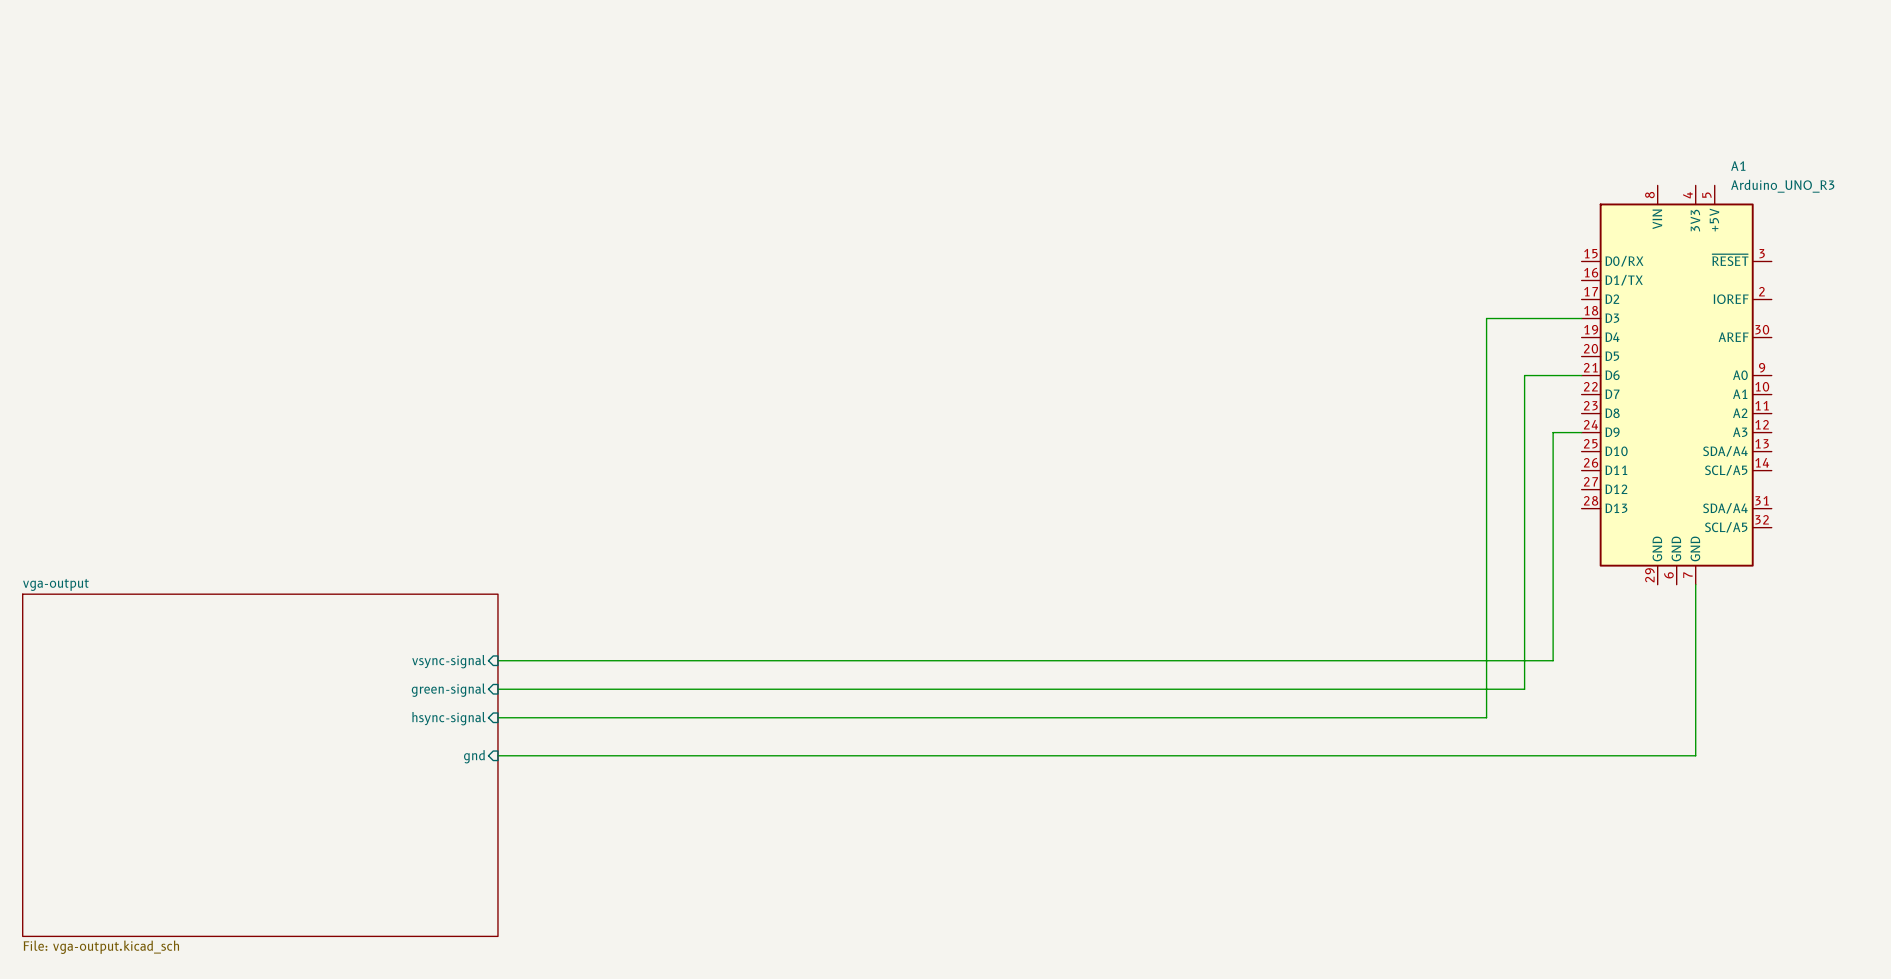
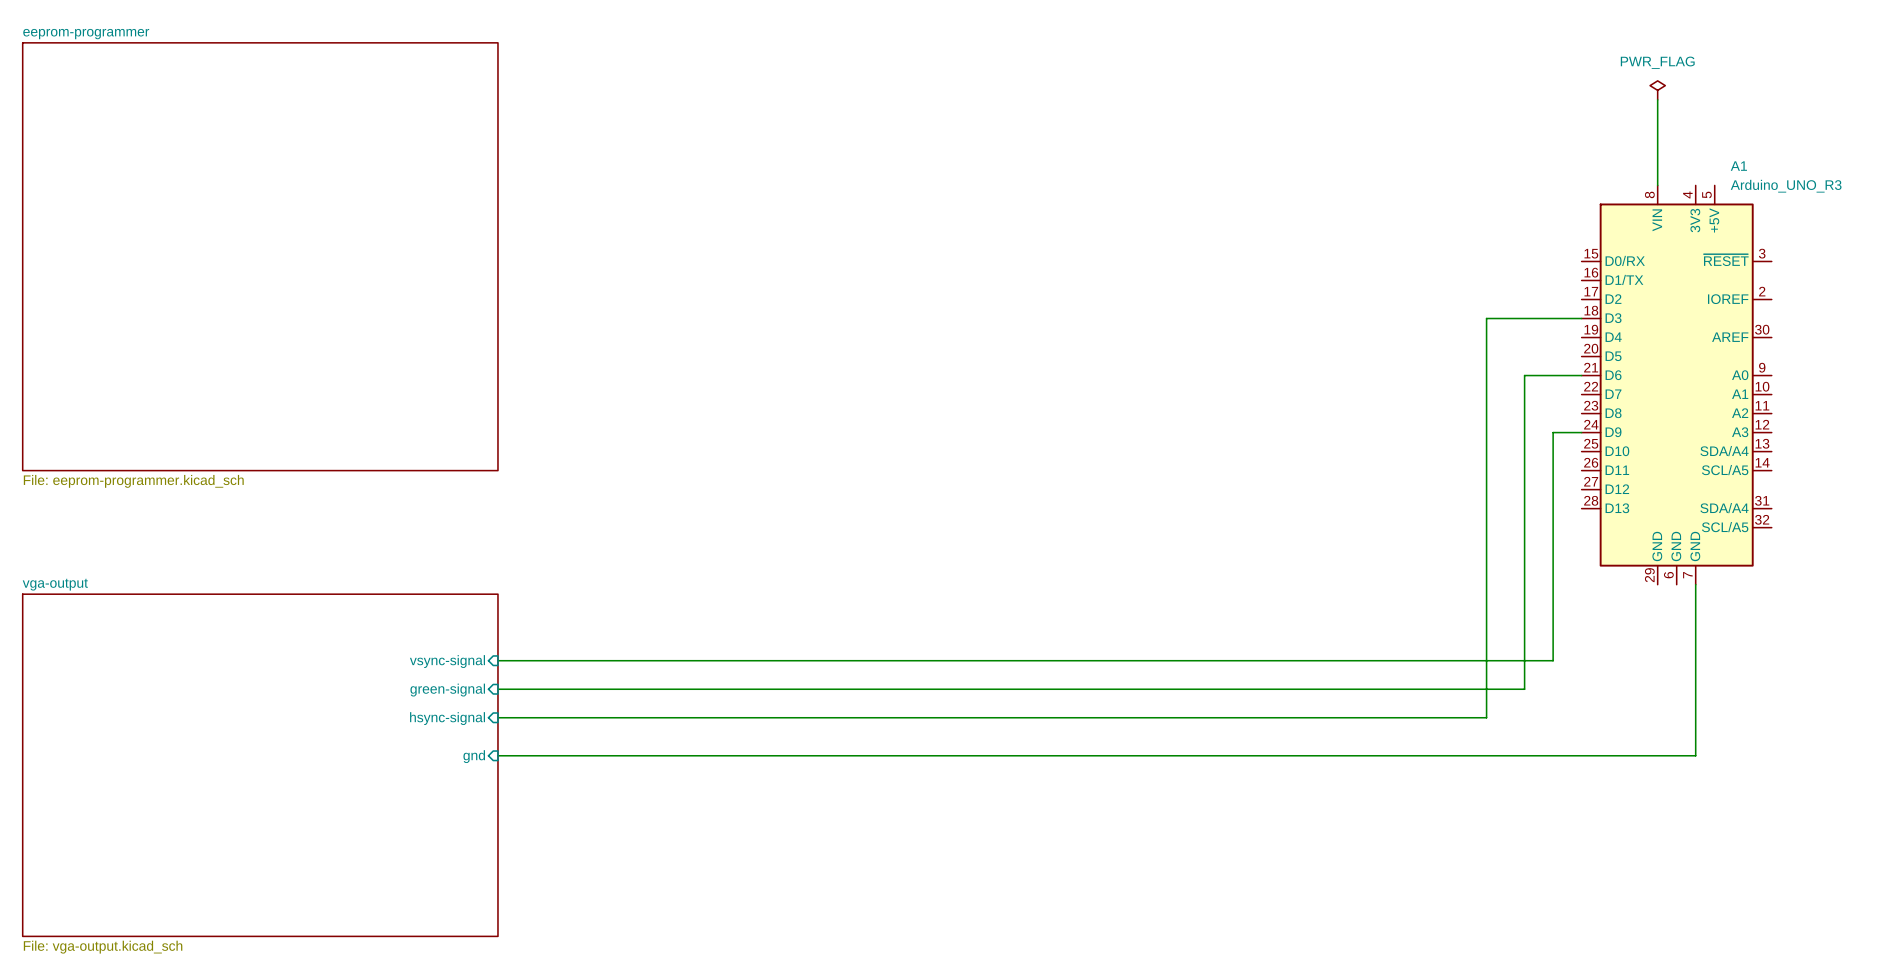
power symbol: none -> PWR_FLAG (1657, 90)
wire: none -> (1657, 99) (1657, 185)
sheet eeprom-programmer: none -> File: eeprom-programmer.kicad_sch (260, 256)

